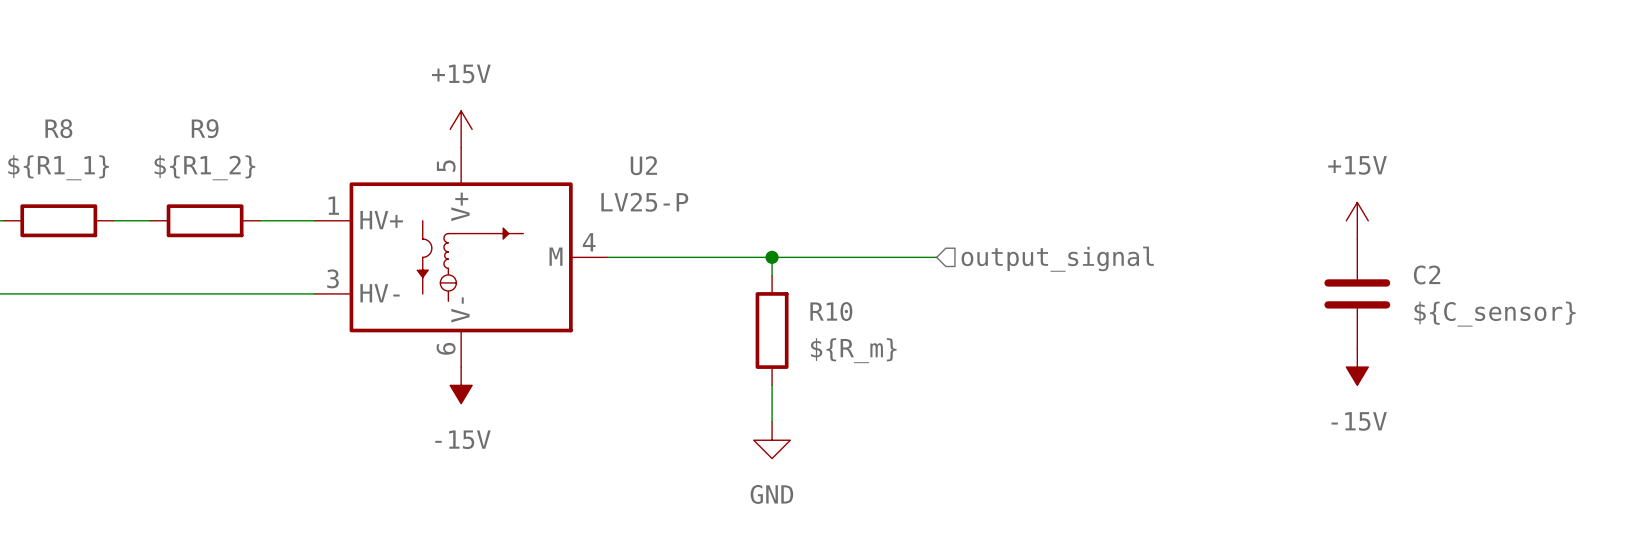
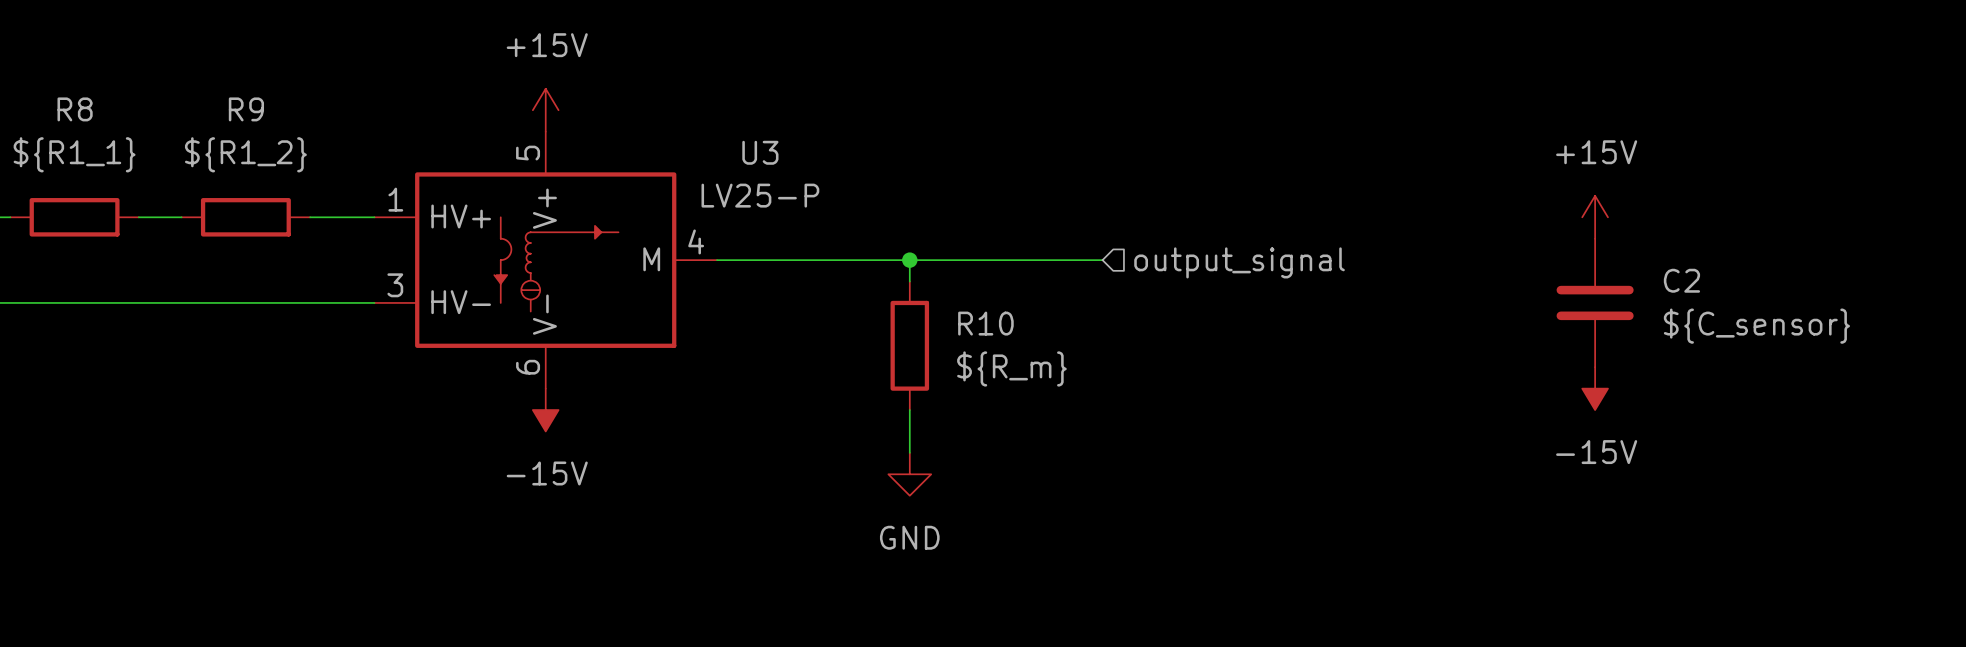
U2 name: U2 (643, 165) -> U3 (760, 152)

